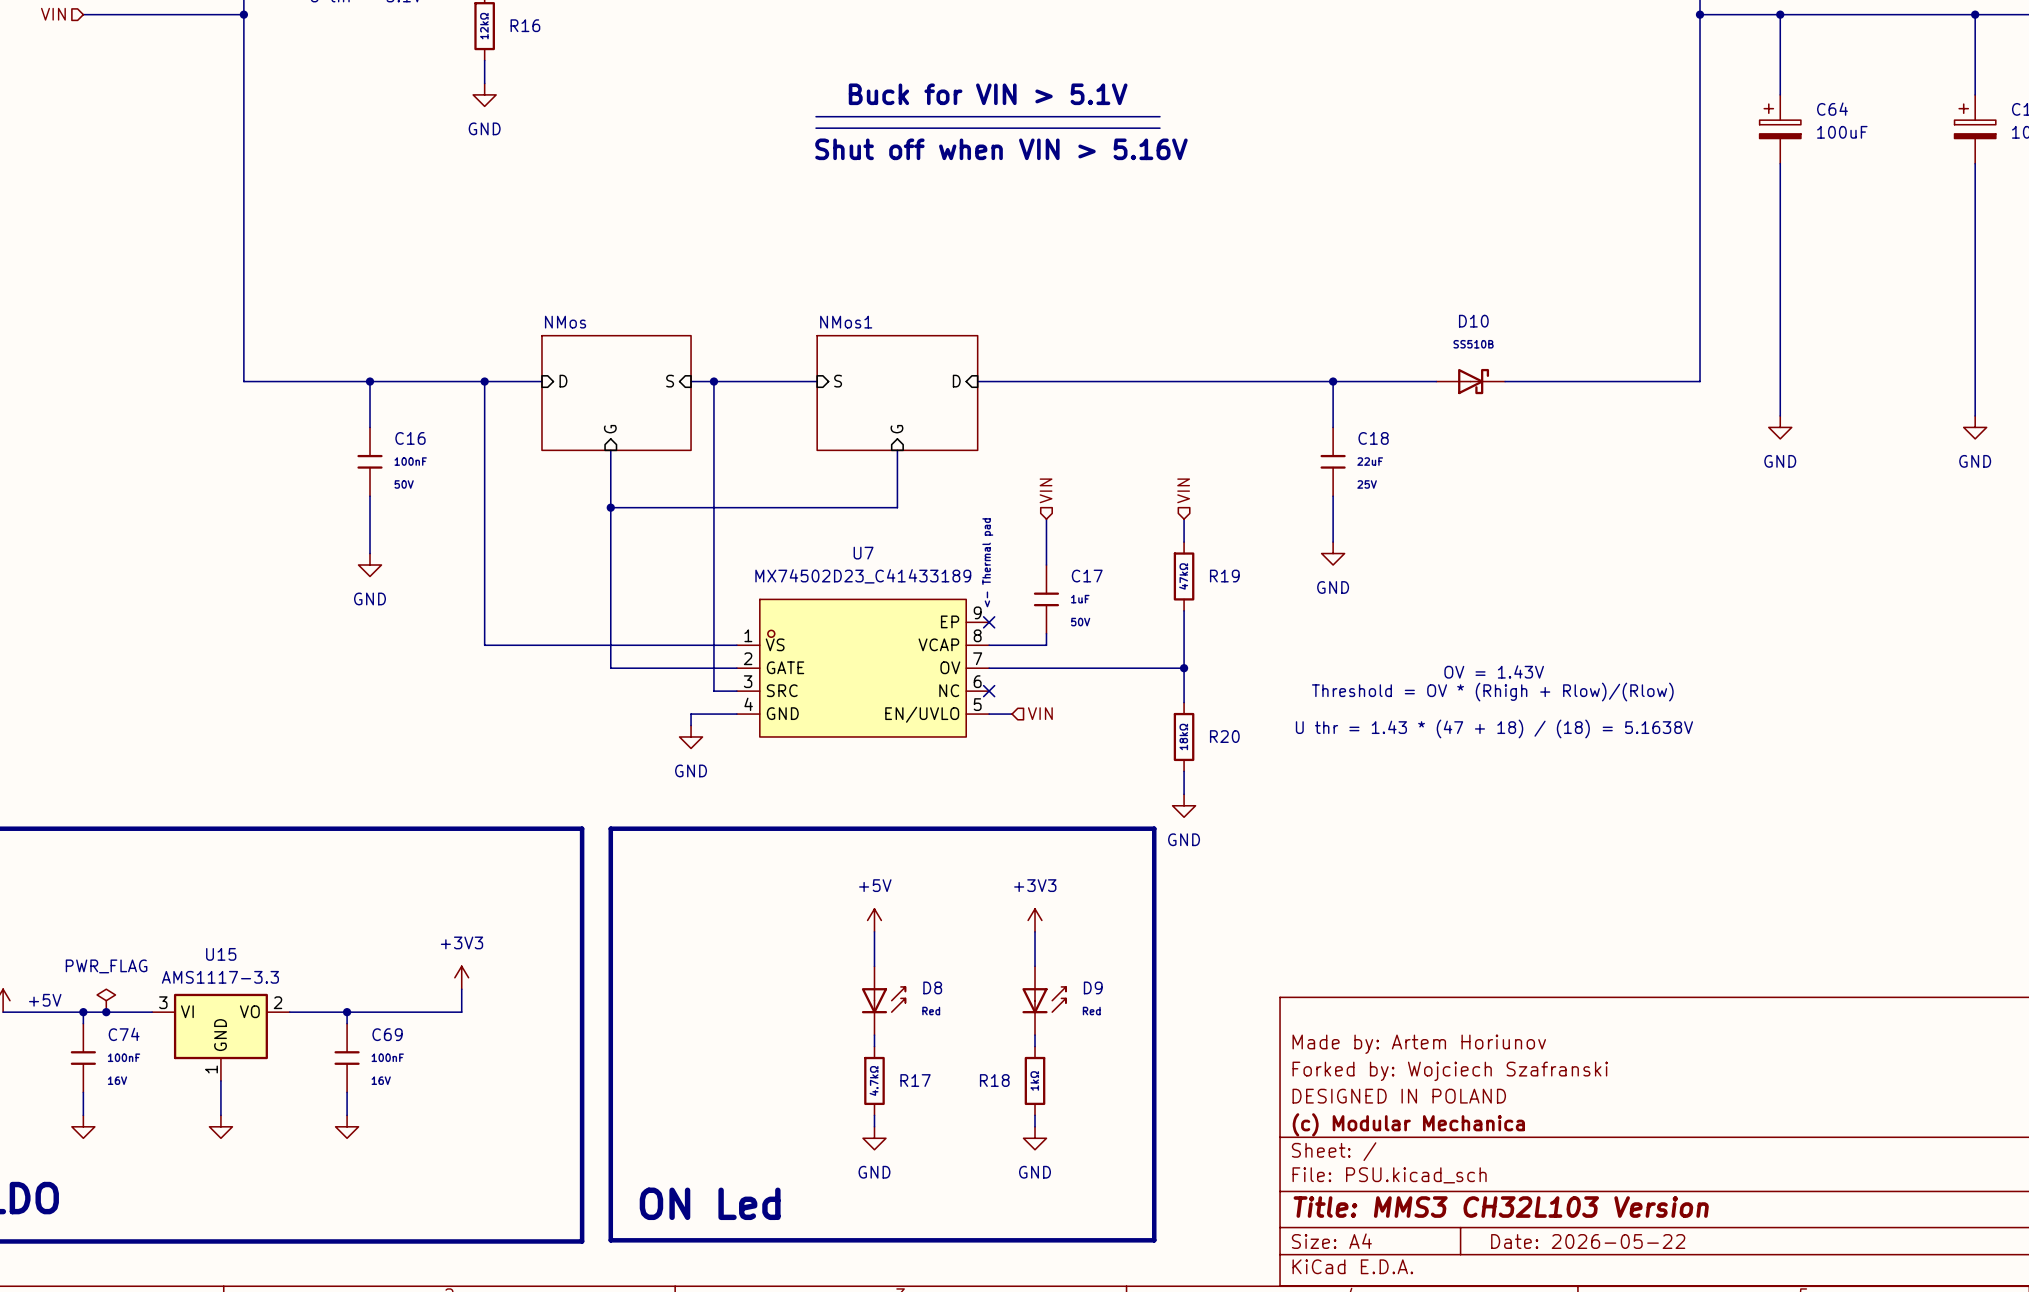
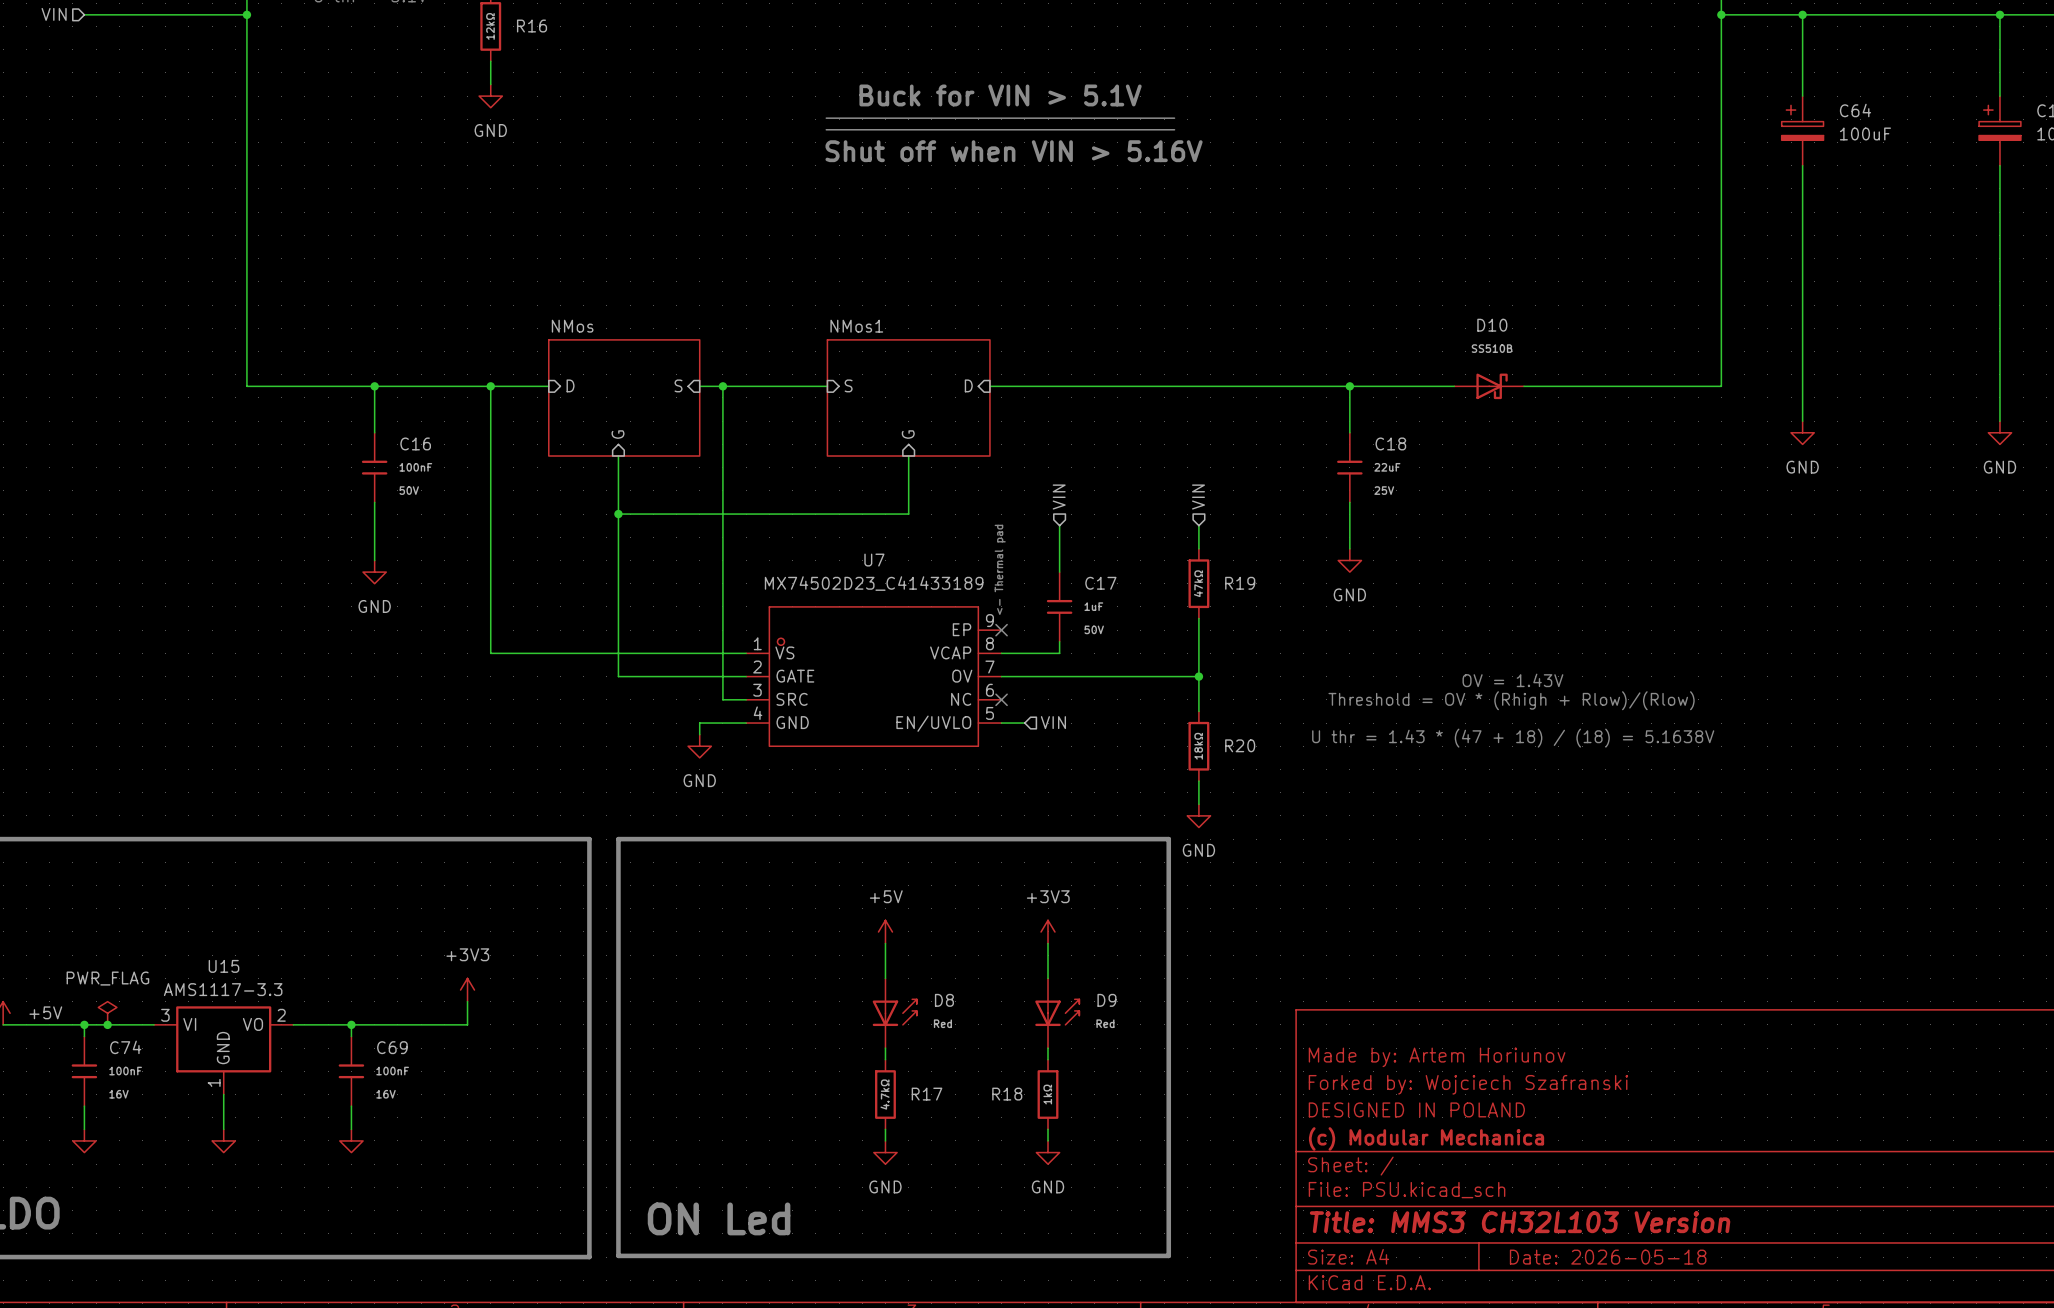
title block: Date: 2026-05-22 (1588, 1241) -> Date: 2026-05-18 (1608, 1257)

